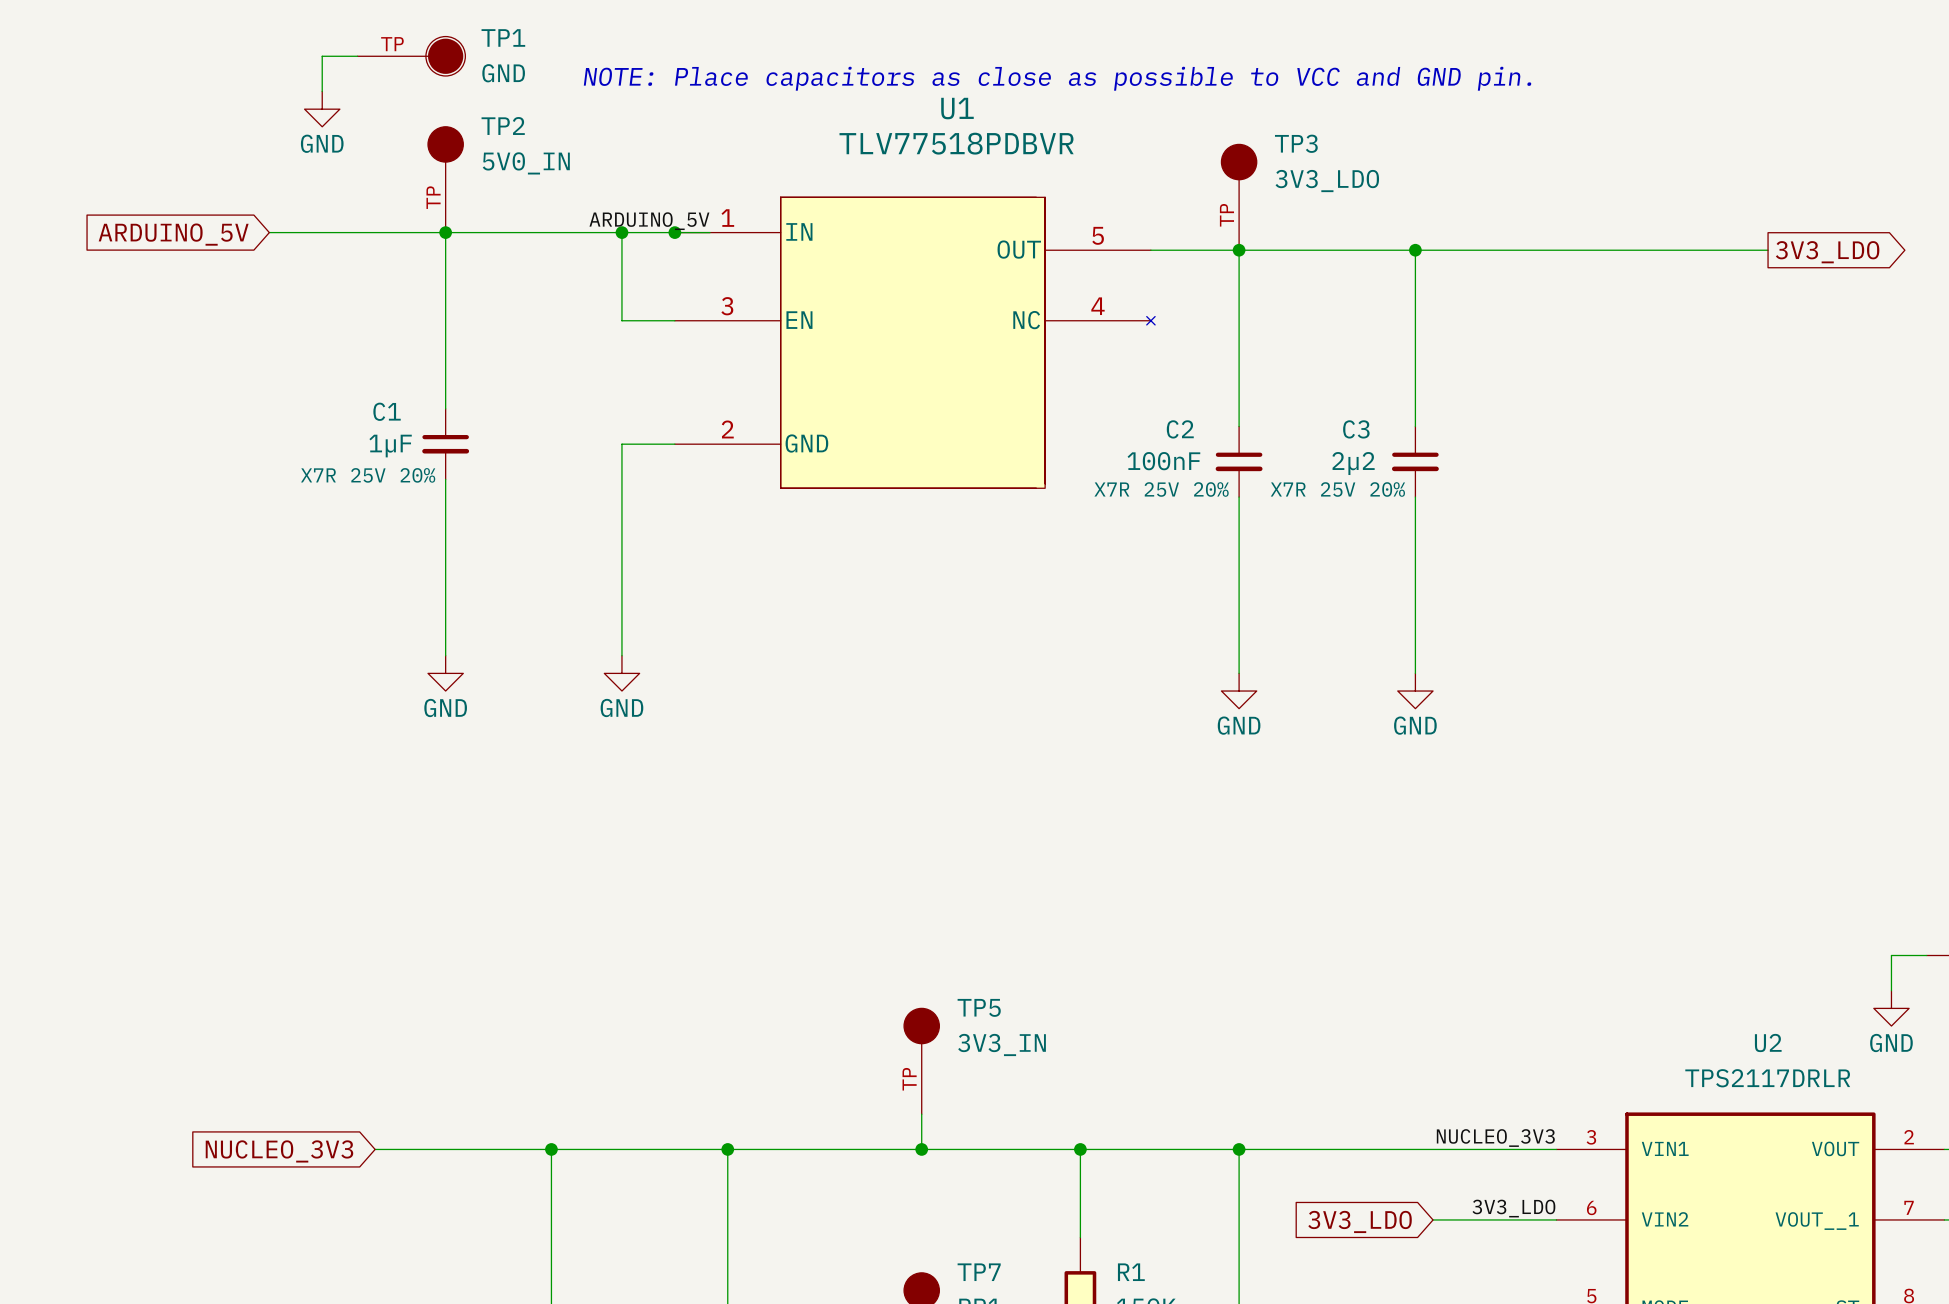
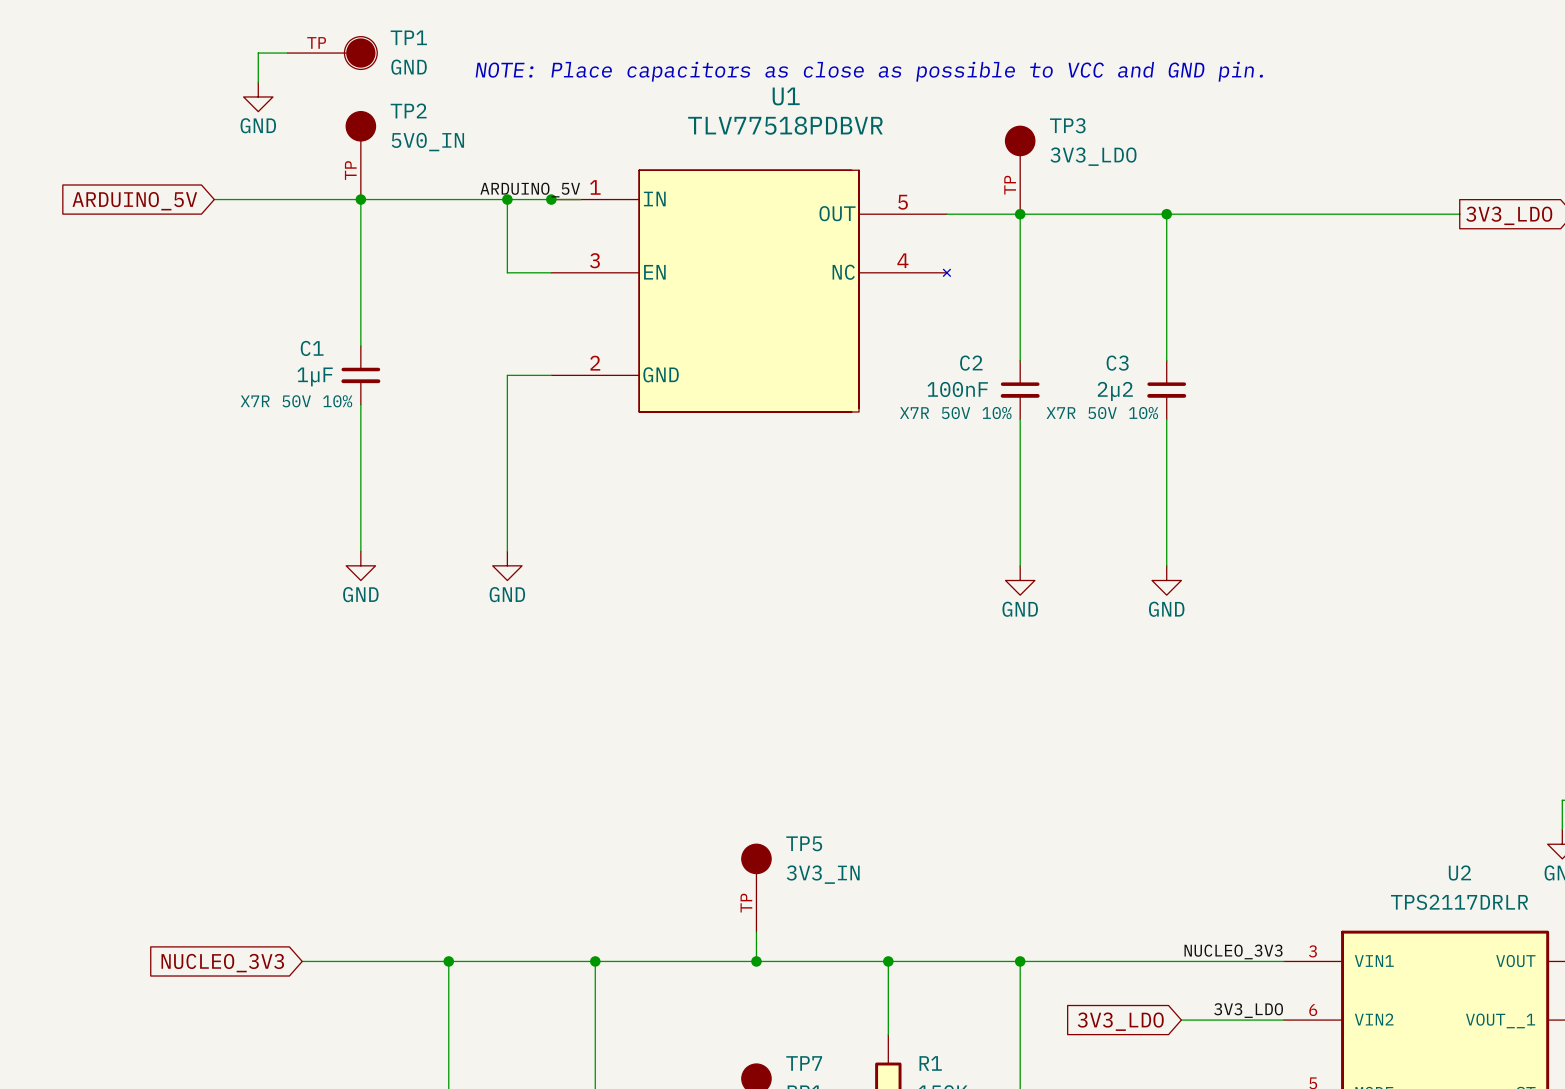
C1 text: 25V (368, 475) -> 50V (296, 401)
C1 text: 20% (417, 475) -> 10% (337, 401)
C2 text: 25V (1161, 489) -> 50V (956, 413)
C2 text: 20% (1211, 489) -> 10% (997, 413)
C3 text: 25V (1338, 489) -> 50V (1102, 413)
C3 text: 20% (1387, 489) -> 10% (1143, 413)

